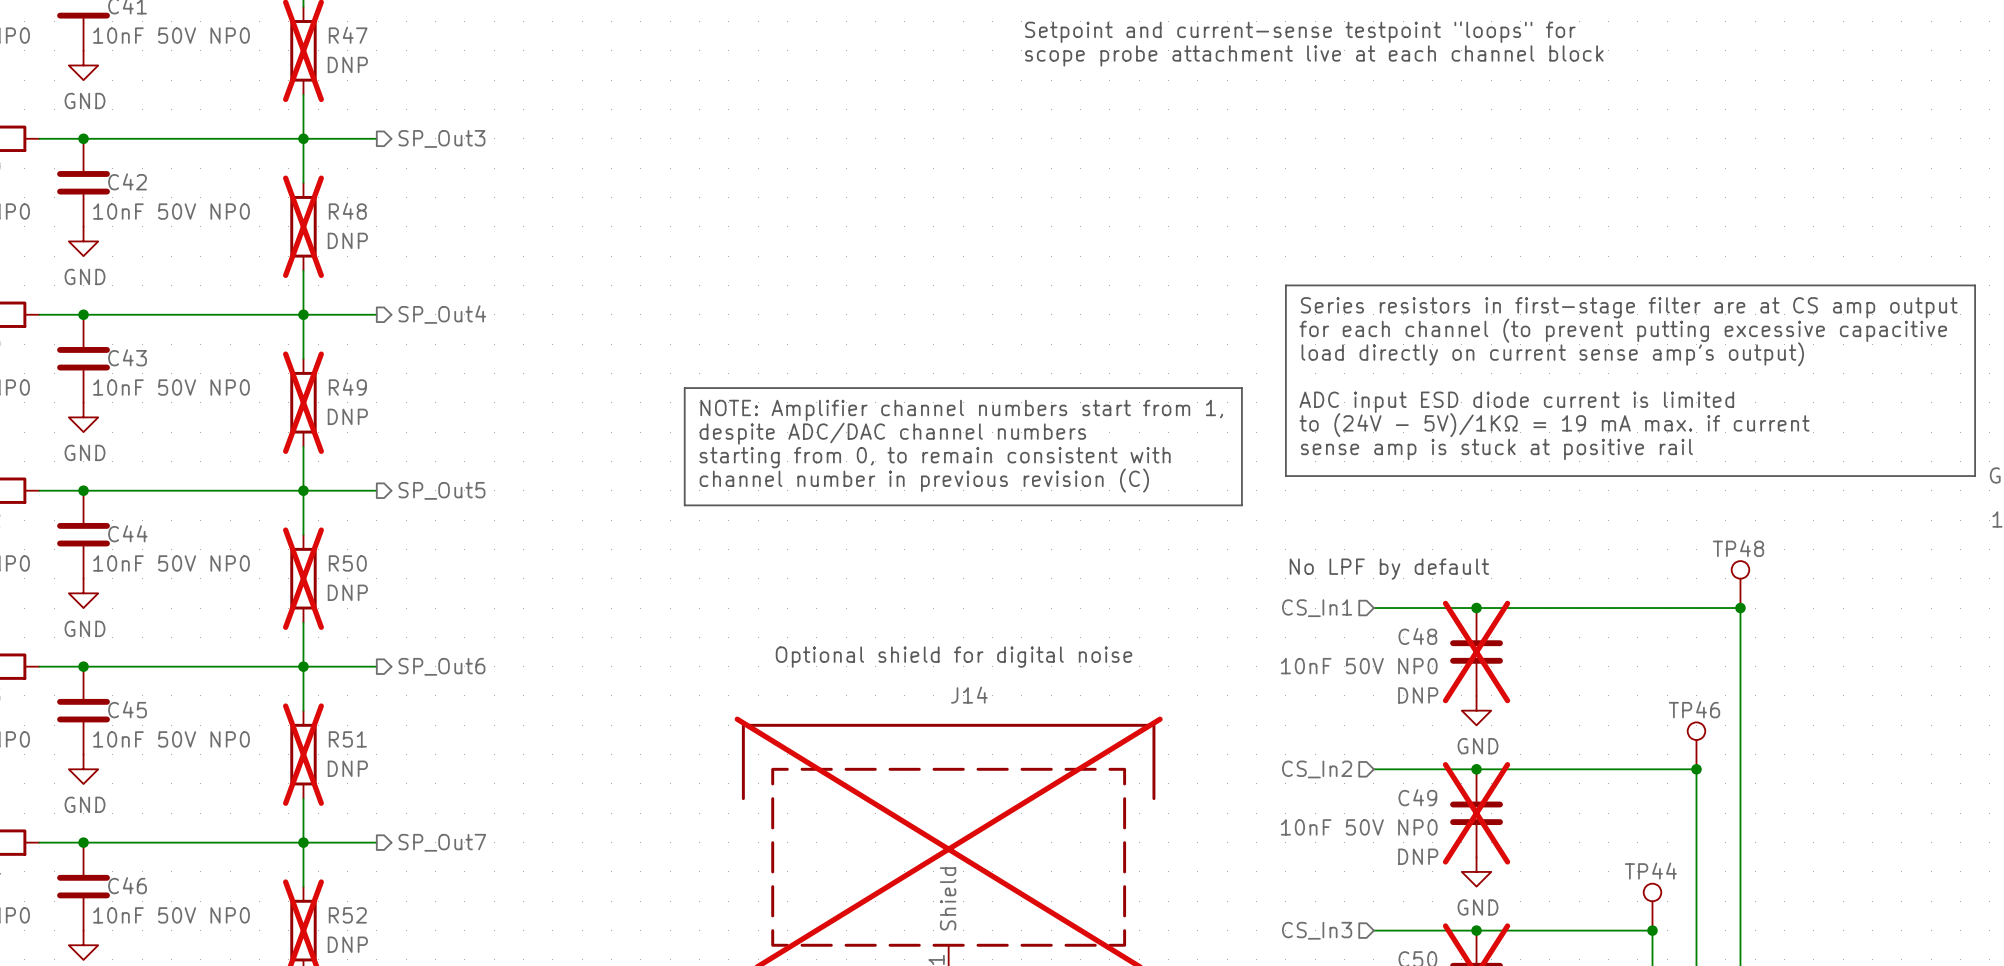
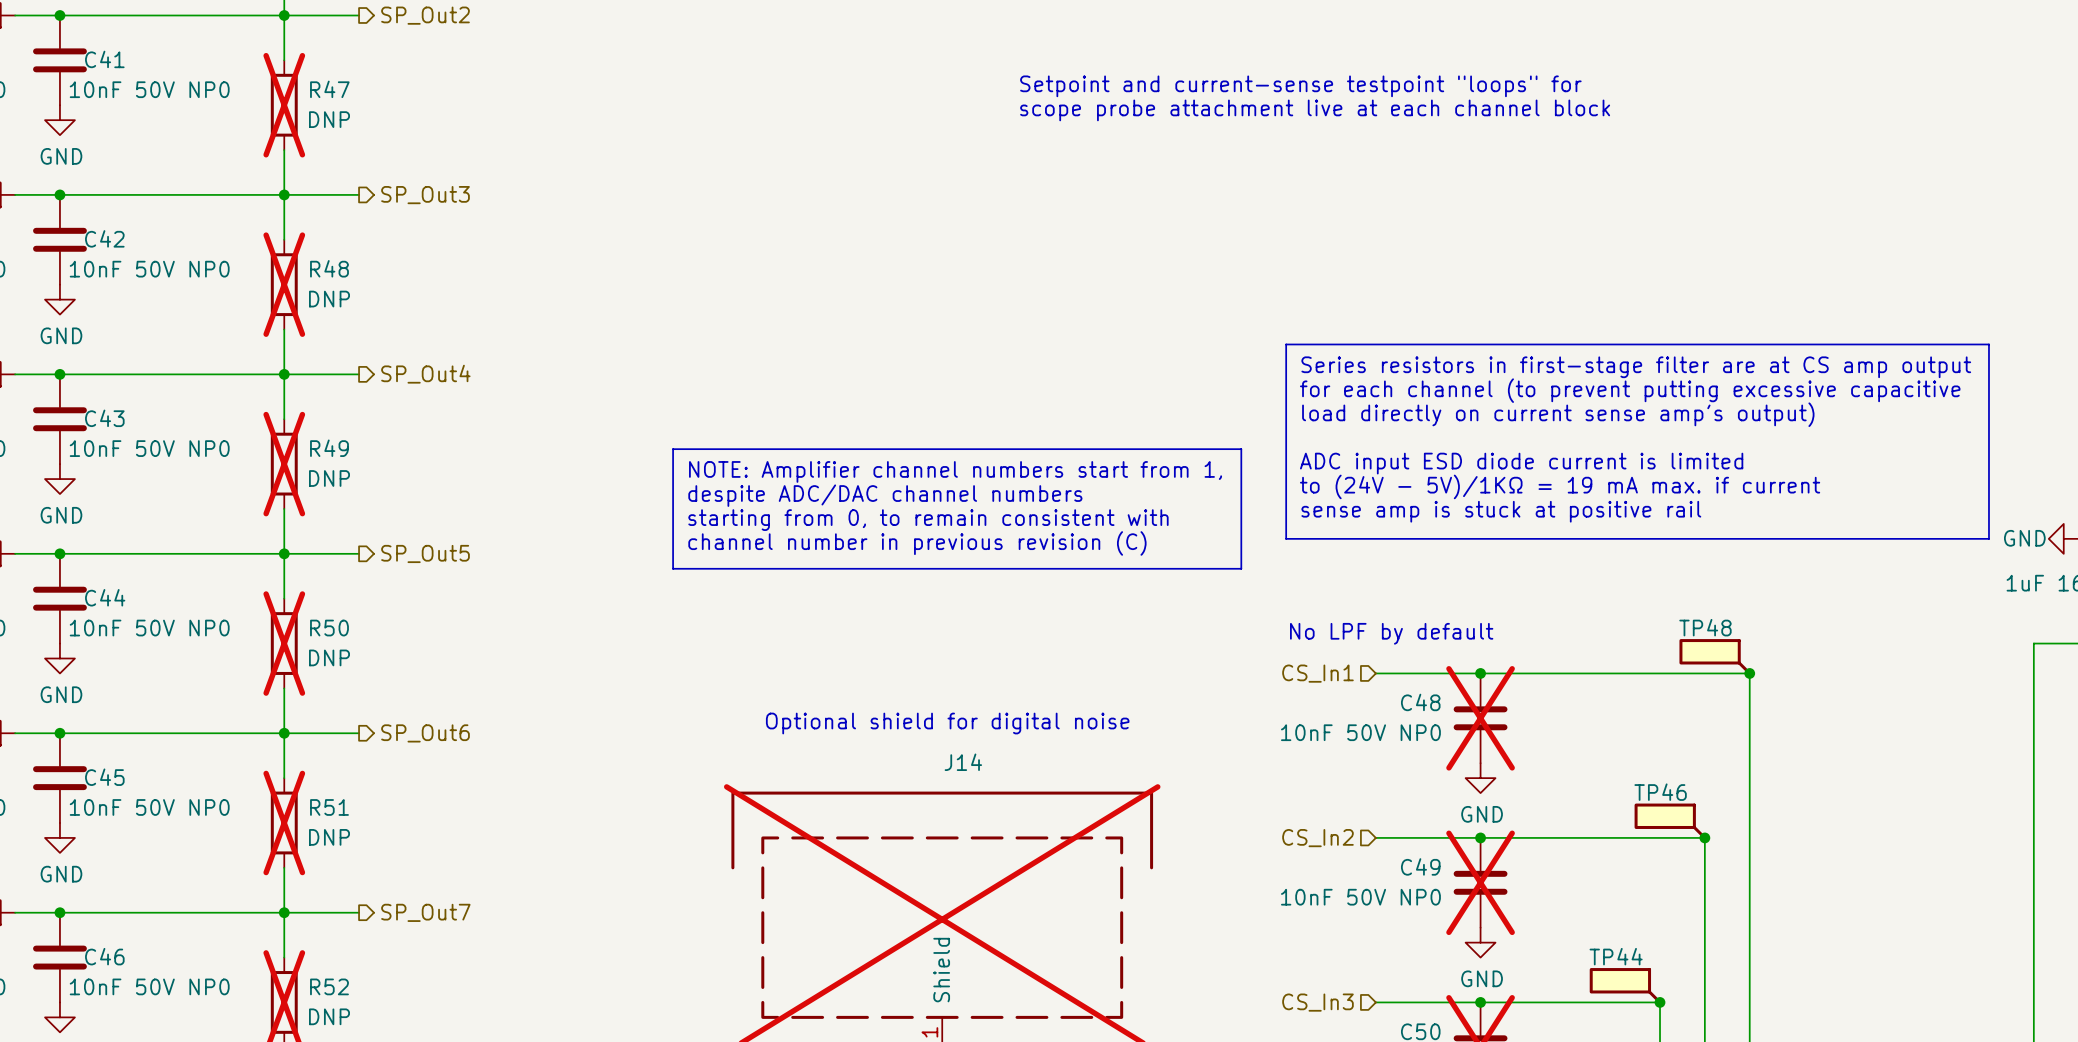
TP48 symbol: [1731, 561, 1750, 609] -> [1679, 639, 1752, 675]
C48 text: DNP (1418, 695) -> none
TP46 symbol: [1687, 722, 1706, 770] -> [1634, 803, 1707, 840]
C49 text: DNP (1418, 856) -> none
TP44 symbol: [1643, 883, 1662, 931] -> [1589, 968, 1662, 1004]

